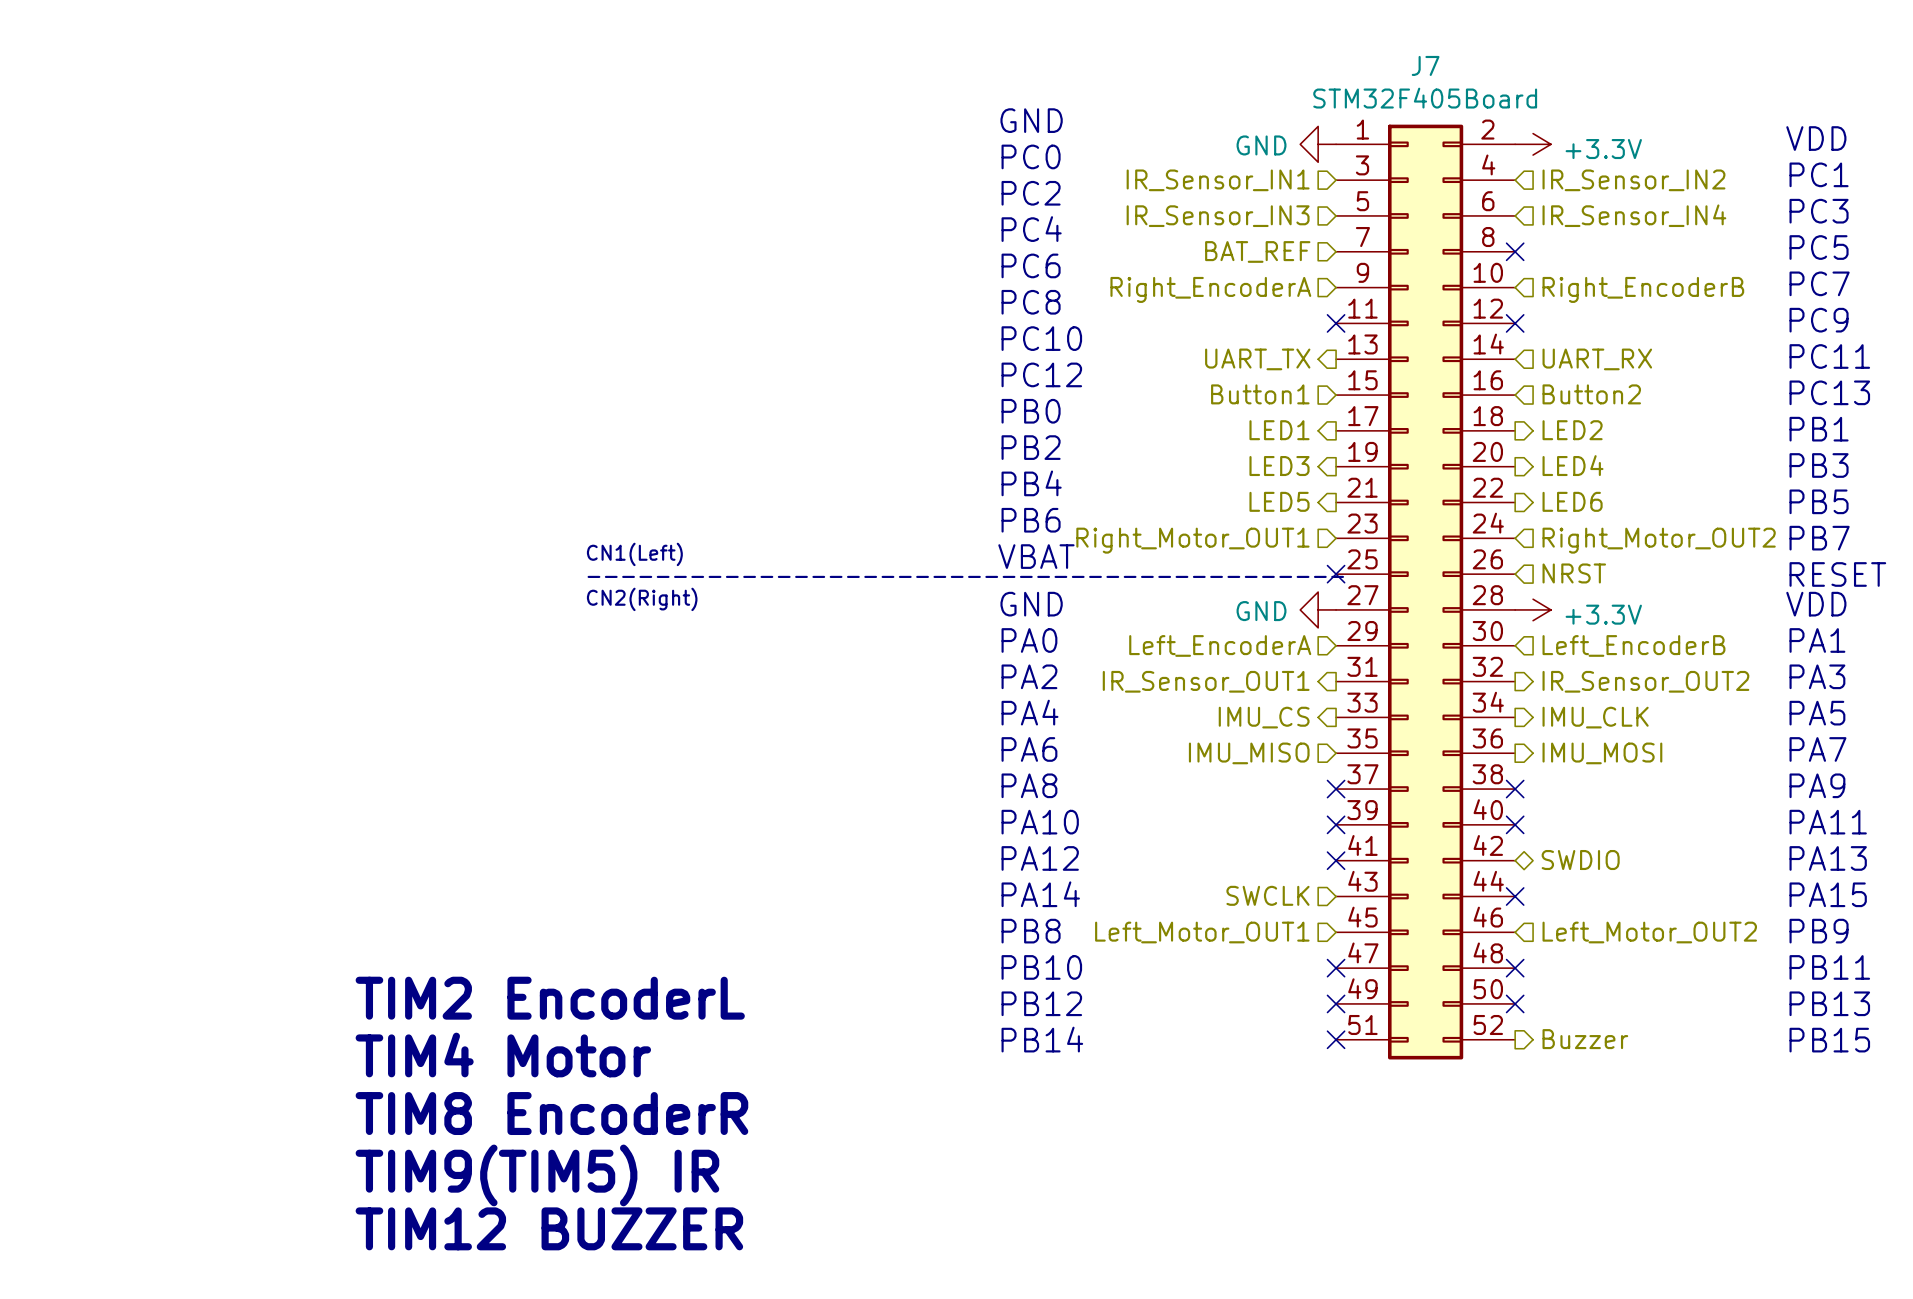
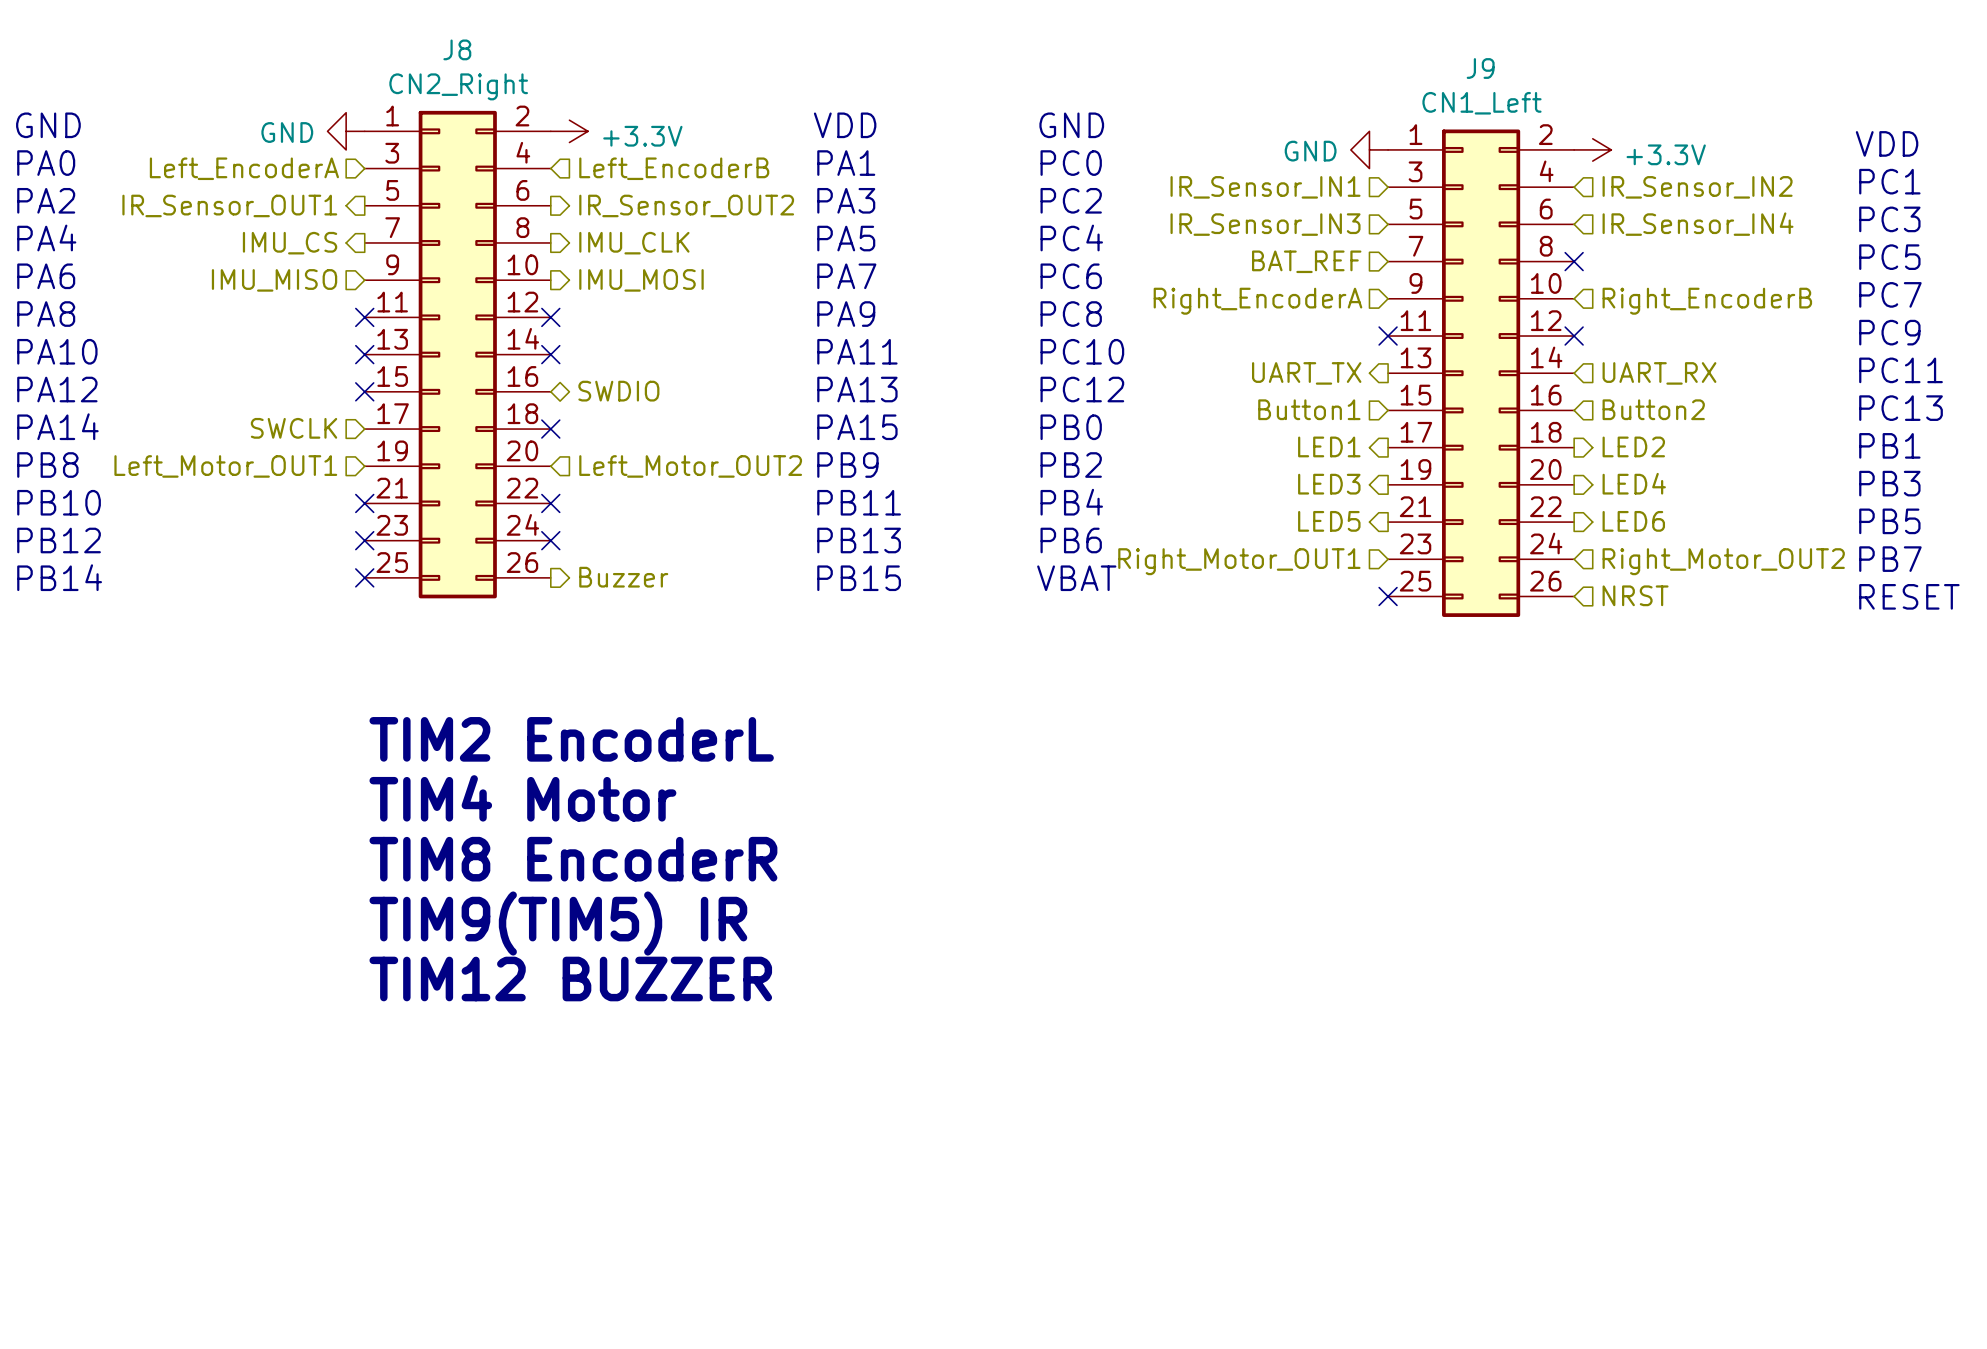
text: none -> GND (48, 125)
text: none -> VDD (845, 125)
power symbol: none -> GND (346, 131)
power symbol: none -> +3.3V (569, 131)
text: none -> PA0 (46, 163)
text: none -> PA1 (846, 163)
hierarchical label: none -> Left_EncoderA (244, 168)
hierarchical label: none -> Left_EncoderB (674, 168)
text: none -> PA2 (46, 200)
text: none -> PA3 (846, 200)
hierarchical label: none -> IR_Sensor_OUT1 (229, 205)
hierarchical label: none -> IR_Sensor_OUT2 (686, 205)
text: none -> PA4 (46, 237)
text: none -> PA5 (846, 238)
hierarchical label: none -> IMU_CS (290, 243)
hierarchical label: none -> IMU_CLK (634, 243)
text: none -> PA6 (46, 276)
text: none -> PA7 (846, 276)
hierarchical label: none -> IMU_MISO (274, 280)
hierarchical label: none -> IMU_MOSI (641, 280)
text: none -> PA8 (46, 314)
text: none -> PA9 (846, 314)
no-connect mark: none -> (364, 317)
no-connect mark: none -> (550, 317)
text: none -> PA10 (57, 351)
text: none -> PA11 (857, 351)
no-connect mark: none -> (364, 354)
J8: none -> CN2_Right (457, 354)
no-connect mark: none -> (550, 354)
J9: none -> CN1_Left (1481, 373)
text: none -> PA12 (57, 389)
text: none -> PA13 (857, 389)
hierarchical label: none -> SWDIO (618, 391)
no-connect mark: none -> (364, 391)
text: none -> PA14 (57, 426)
text: none -> PA15 (857, 427)
hierarchical label: none -> SWCLK (294, 428)
no-connect mark: none -> (550, 429)
text: none -> PB8 (47, 465)
text: none -> PB9 (847, 465)
hierarchical label: none -> Left_Motor_OUT1 (225, 466)
hierarchical label: none -> Left_Motor_OUT2 (690, 466)
text: none -> PB10 (59, 502)
text: none -> PB11 (859, 502)
no-connect mark: none -> (364, 503)
no-connect mark: none -> (550, 503)
text: none -> PB12 (59, 540)
no-connect mark: none -> (364, 540)
no-connect mark: none -> (550, 540)
text: none -> PB13 (859, 540)
text: CN1(Left) (634, 554) -> none
hierarchical label: none -> Buzzer (623, 577)
text: none -> PB14 (59, 577)
no-connect mark: none -> (364, 577)
text: none -> PB15 (859, 578)
text: -------------------------------------------- (965, 576) -> none
J7: STM32F405Board (1425, 592) -> none
text: CN2(Right) (642, 599) -> none
text: GND (1031, 604) -> none
text: VDD (1816, 604) -> none
power symbol: GND (1318, 609) -> none
power symbol: +3.3V (1533, 609) -> none
text: PA0 (1029, 640) -> none
text: PA1 (1817, 640) -> none
hierarchical label: Left_EncoderA (1220, 645) -> none
hierarchical label: Left_EncoderB (1633, 645) -> none
text: PA2 (1029, 676) -> none
text: PA3 (1817, 676) -> none
hierarchical label: IR_Sensor_OUT1 (1206, 681) -> none
hierarchical label: IR_Sensor_OUT2 (1645, 681) -> none
text: PA4 (1029, 712) -> none
text: PA5 (1817, 713) -> none
hierarchical label: IMU_CS (1264, 717) -> none
hierarchical label: IMU_CLK (1595, 717) -> none
text: PA6 (1029, 749) -> none
text: PA7 (1817, 749) -> none
hierarchical label: IMU_MISO (1249, 753) -> none
hierarchical label: IMU_MOSI (1602, 753) -> none
text: PA8 (1029, 785) -> none
text: PA9 (1817, 785) -> none
no-connect mark: (1336, 789) -> none
no-connect mark: (1515, 789) -> none
text: PA10 (1040, 822) -> none
text: PA11 (1828, 822) -> none
no-connect mark: (1336, 824) -> none
no-connect mark: (1515, 824) -> none
text: PA12 (1040, 858) -> none
text: PA13 (1828, 858) -> none
no-connect mark: (1336, 860) -> none
hierarchical label: SWDIO (1580, 860) -> none
text: PA14 (1040, 894) -> none
text: PA15 (1828, 894) -> none
hierarchical label: SWCLK (1267, 895) -> none
no-connect mark: (1515, 896) -> none
text: PB8 (1031, 931) -> none
text: PB9 (1819, 931) -> none
hierarchical label: Left_Motor_OUT1 (1202, 932) -> none
hierarchical label: Left_Motor_OUT2 (1649, 932) -> none
text: PB10 (1041, 967) -> none
text: PB11 (1829, 967) -> none
no-connect mark: (1336, 968) -> none
no-connect mark: (1515, 968) -> none
text position: TIM2 EncoderL (550, 998) -> TIM2 EncoderL (571, 739)
text: PB12 (1041, 1003) -> none
no-connect mark: (1336, 1003) -> none
no-connect mark: (1515, 1003) -> none
text: PB13 (1829, 1003) -> none
text: PB14 (1042, 1039) -> none
no-connect mark: (1336, 1039) -> none
hierarchical label: Buzzer (1585, 1039) -> none
text: PB15 (1829, 1040) -> none
text position: TIM4 Motor (503, 1055) -> TIM4 Motor (522, 798)
text position: TIM8 EncoderR (551, 1113) -> TIM8 EncoderR (573, 859)
text position: TIM9(TIM5) IR (537, 1175) -> TIM9(TIM5) IR (558, 923)
text position: TIM12 BUZZER (549, 1228) -> TIM12 BUZZER (570, 978)

